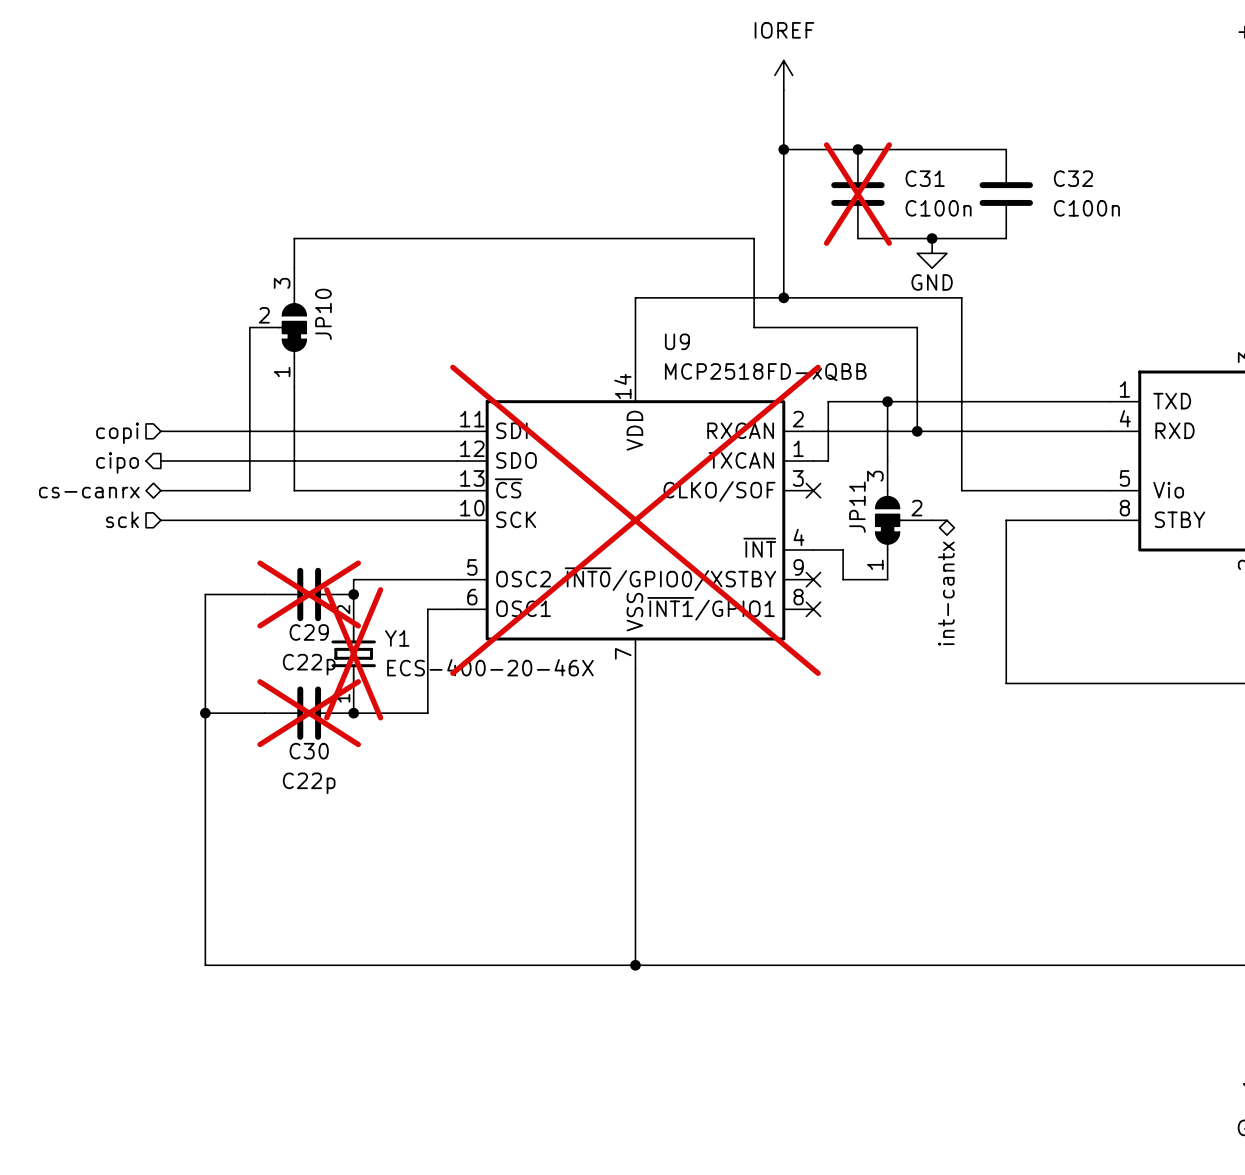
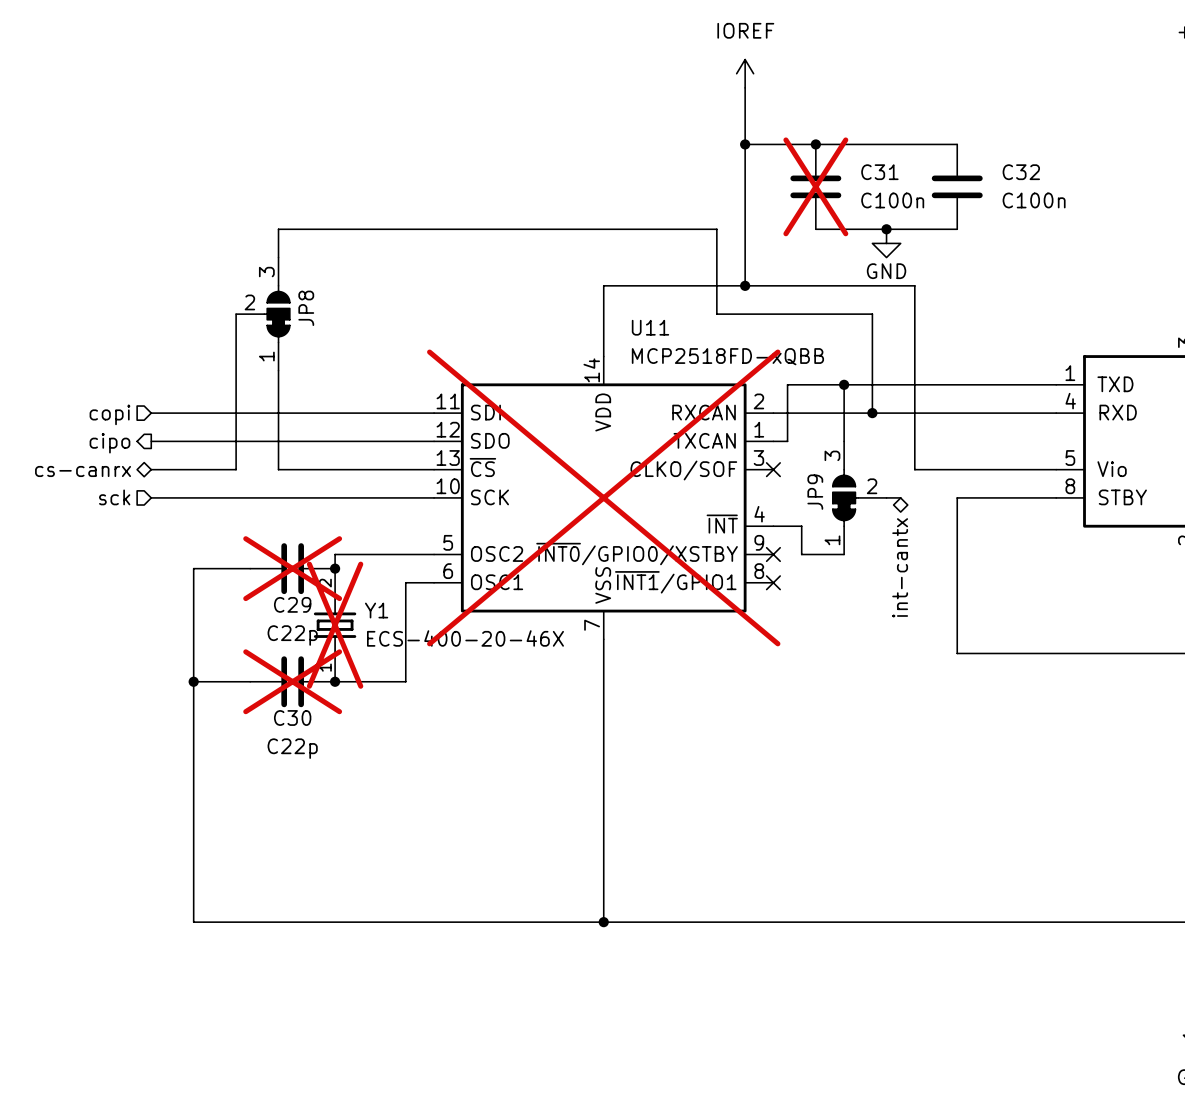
JP10 name: JP10 (323, 314) -> JP8 (306, 308)
U9 name: U9 (677, 341) -> U11 (650, 327)
JP11 name: JP11 (857, 507) -> JP9 (815, 492)

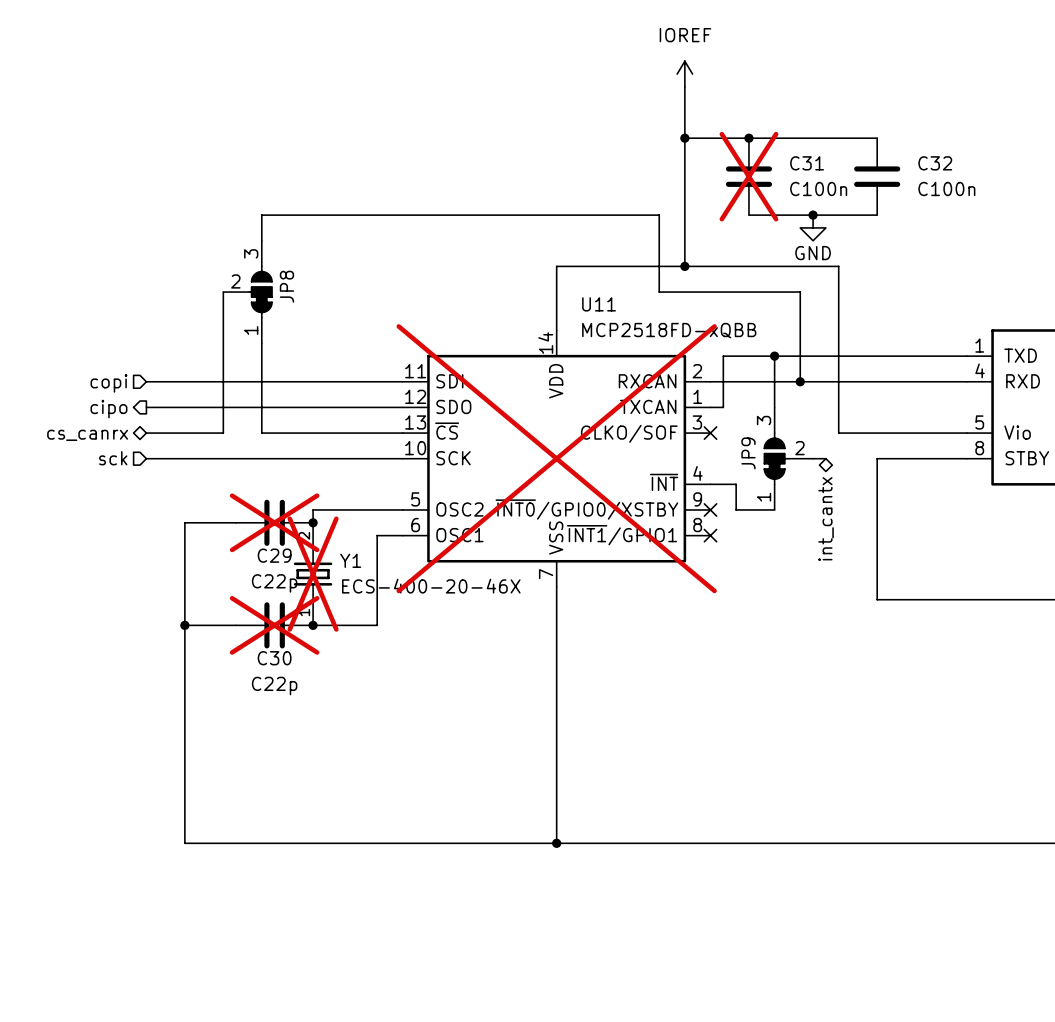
hierarchical label: cs-canrx (83, 471) -> cs_canrx (87, 435)
hierarchical label: int-cantx (900, 567) -> int_cantx (826, 519)

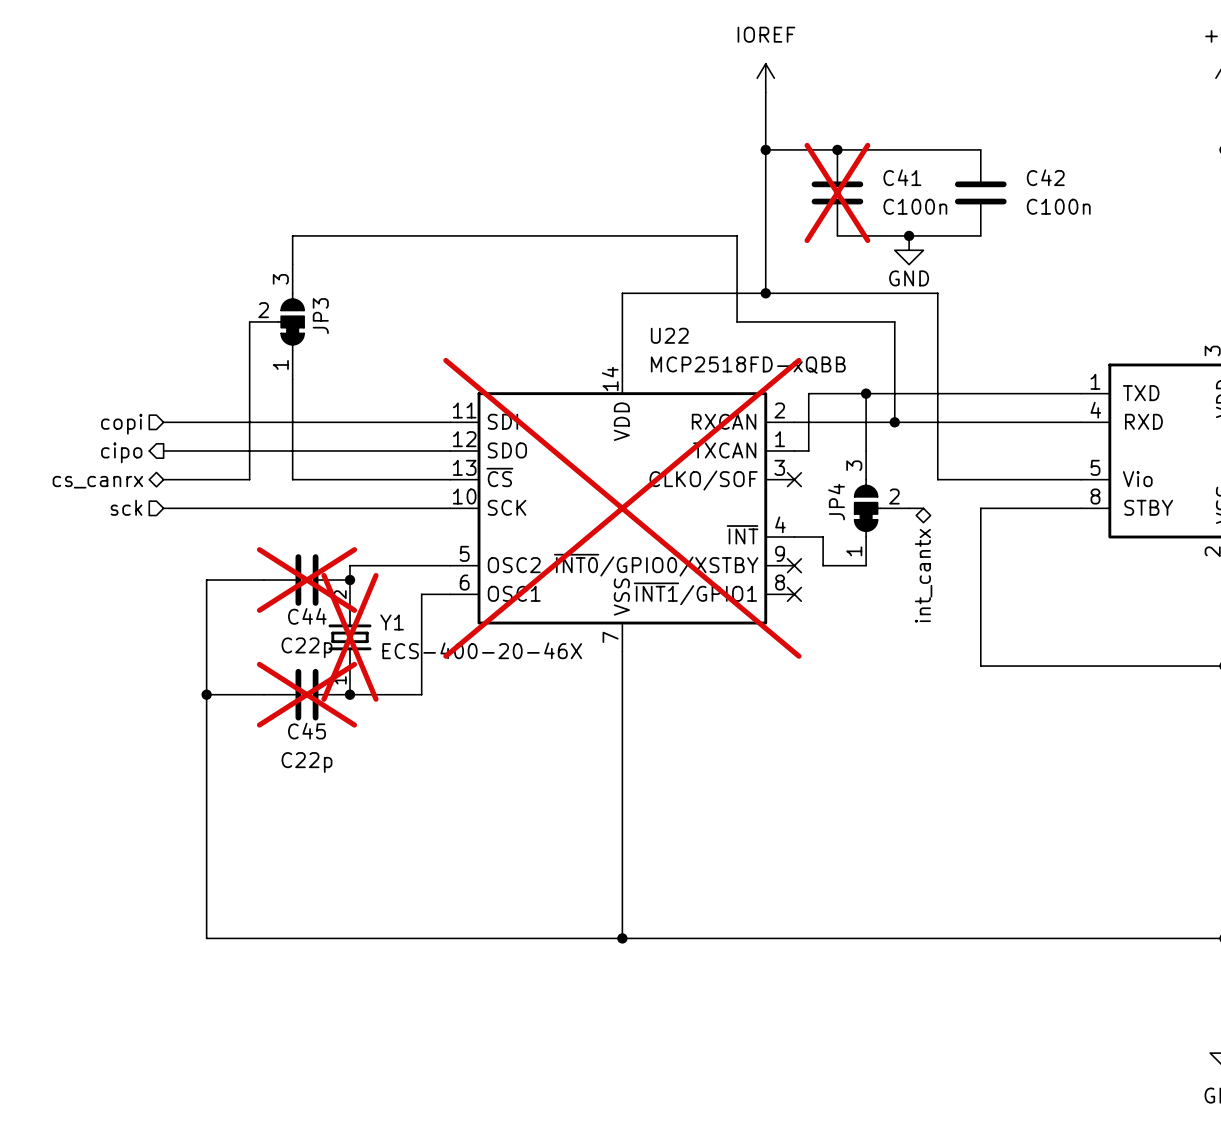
C31 name: C31 (807, 163) -> C41 (902, 177)
C32 name: C32 (935, 163) -> C42 (1045, 177)
JP8 name: JP8 (286, 286) -> JP3 (320, 316)
U11 name: U11 (599, 304) -> U22 (669, 335)
JP9 name: JP9 (748, 453) -> JP4 (836, 502)
C29 name: C29 (274, 555) -> C44 (307, 616)
C30 name: C30 (274, 658) -> C45 (306, 731)

